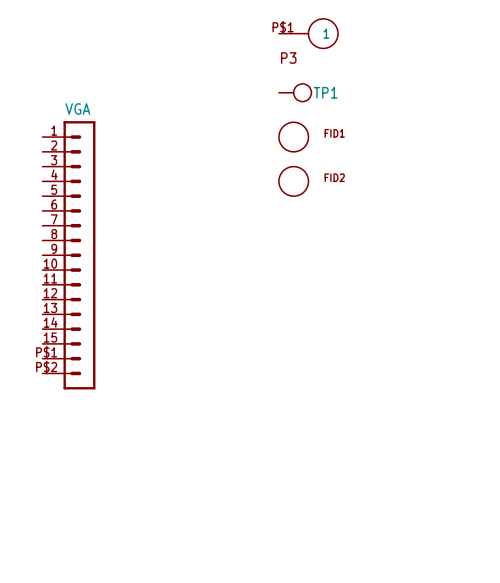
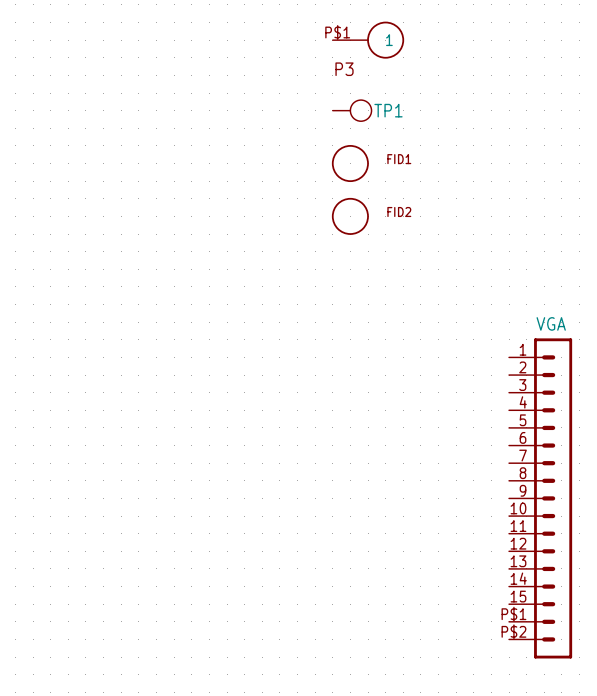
part: (68, 255) -> none
part: none -> (540, 498)

